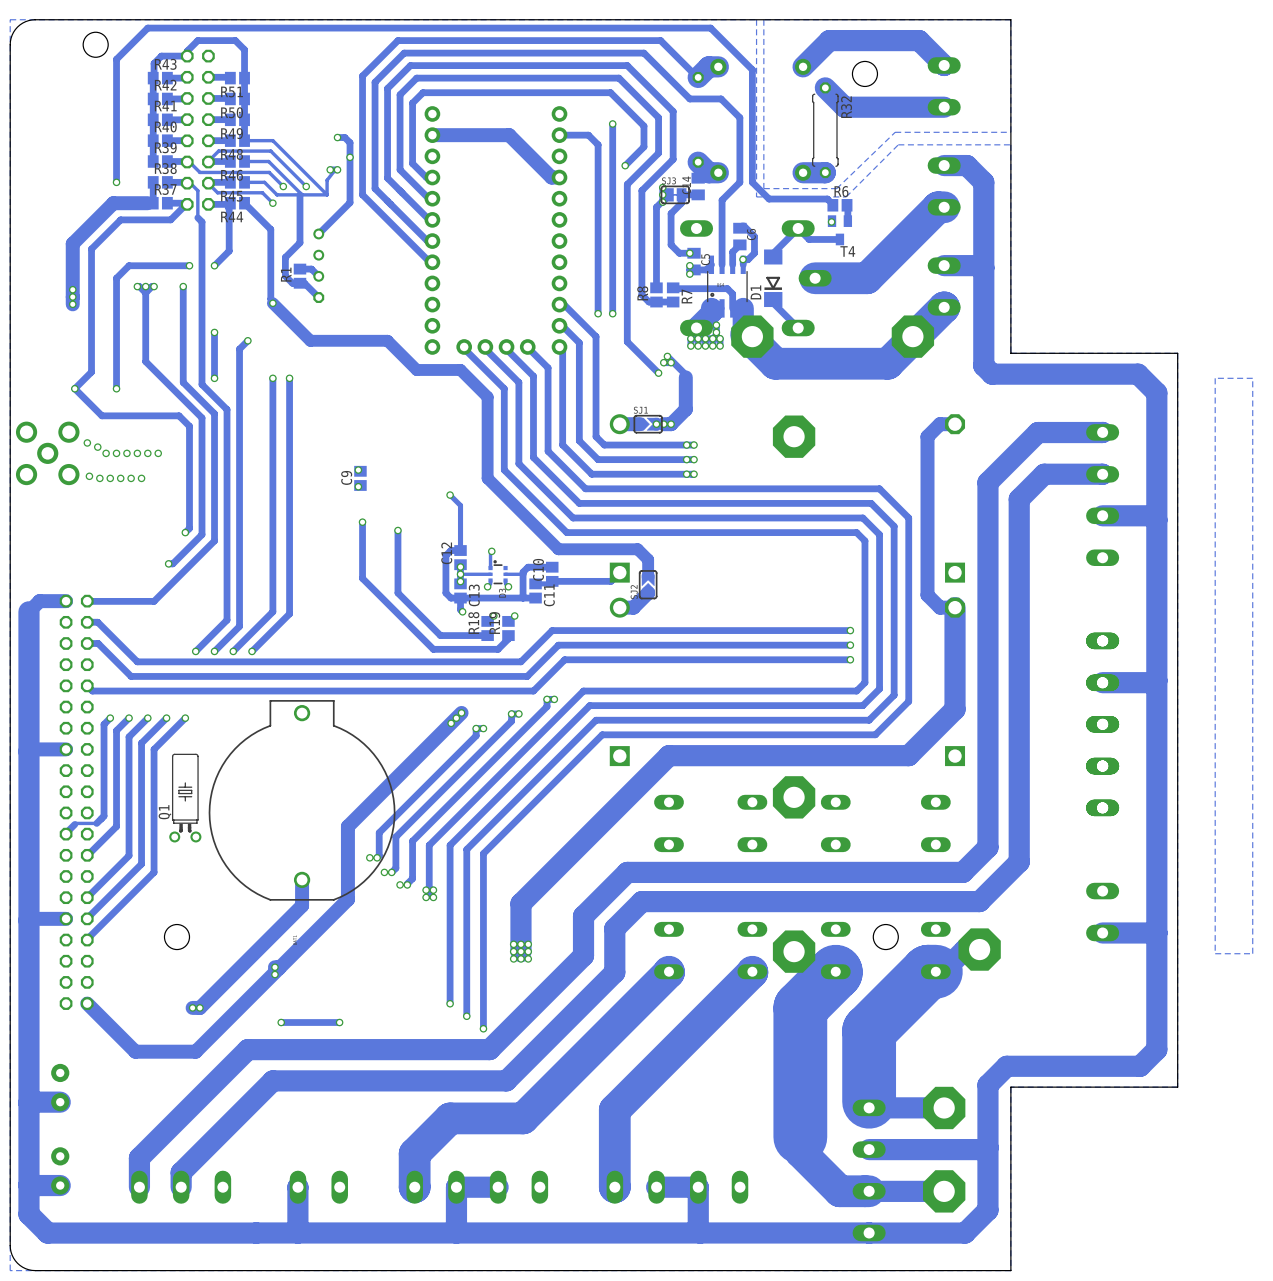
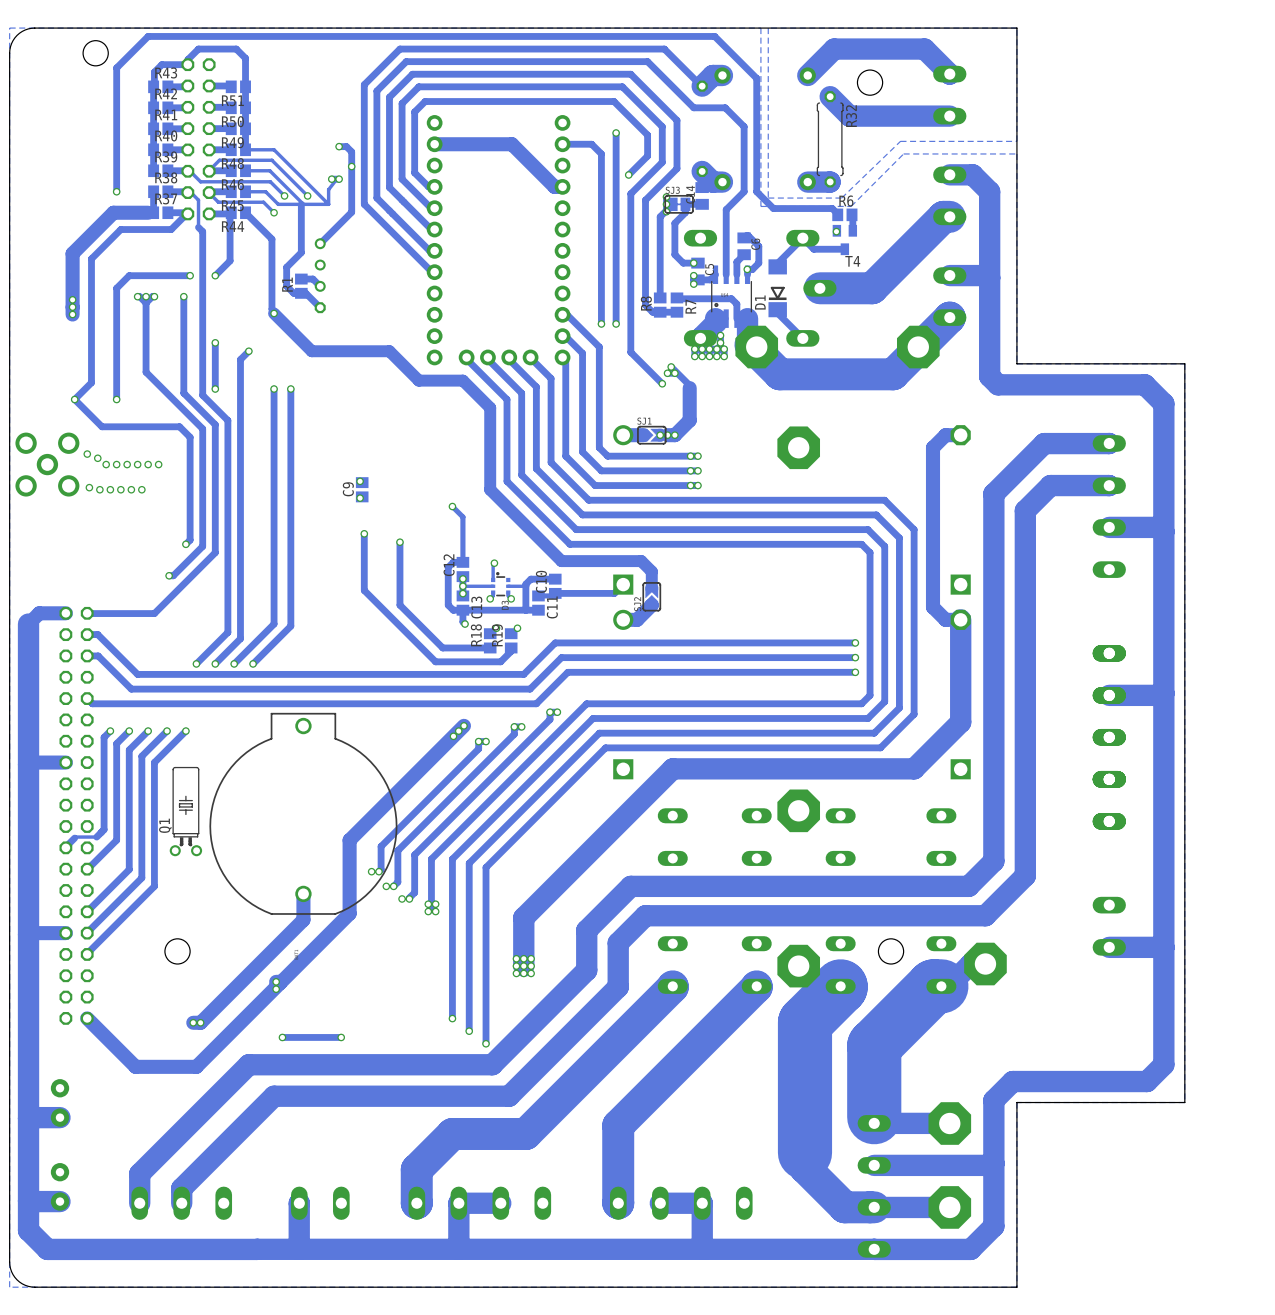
zone outline: (1252, 378) (1215, 378) (1215, 953) (1252, 953) (1252, 378) -> none

